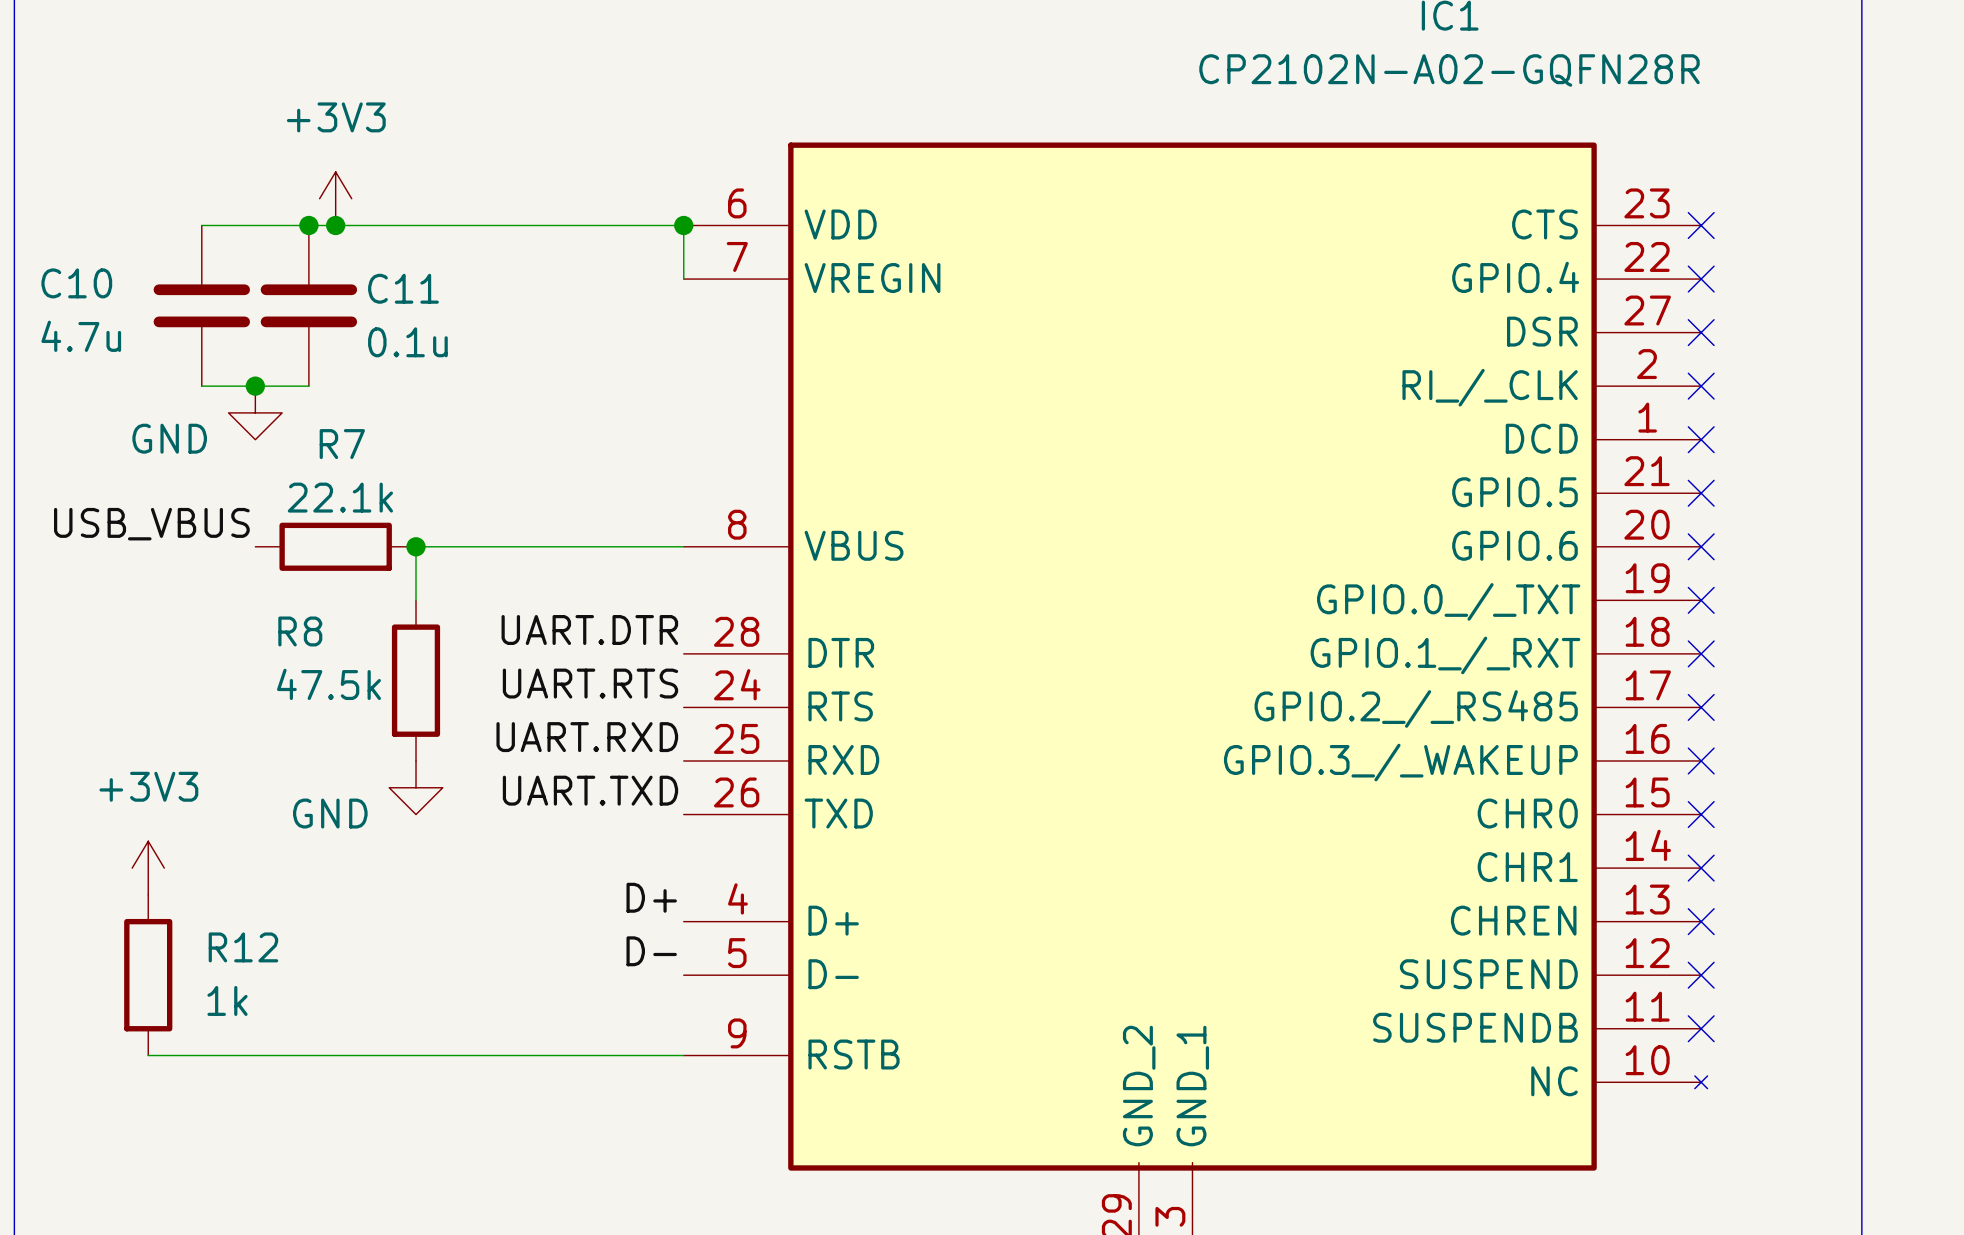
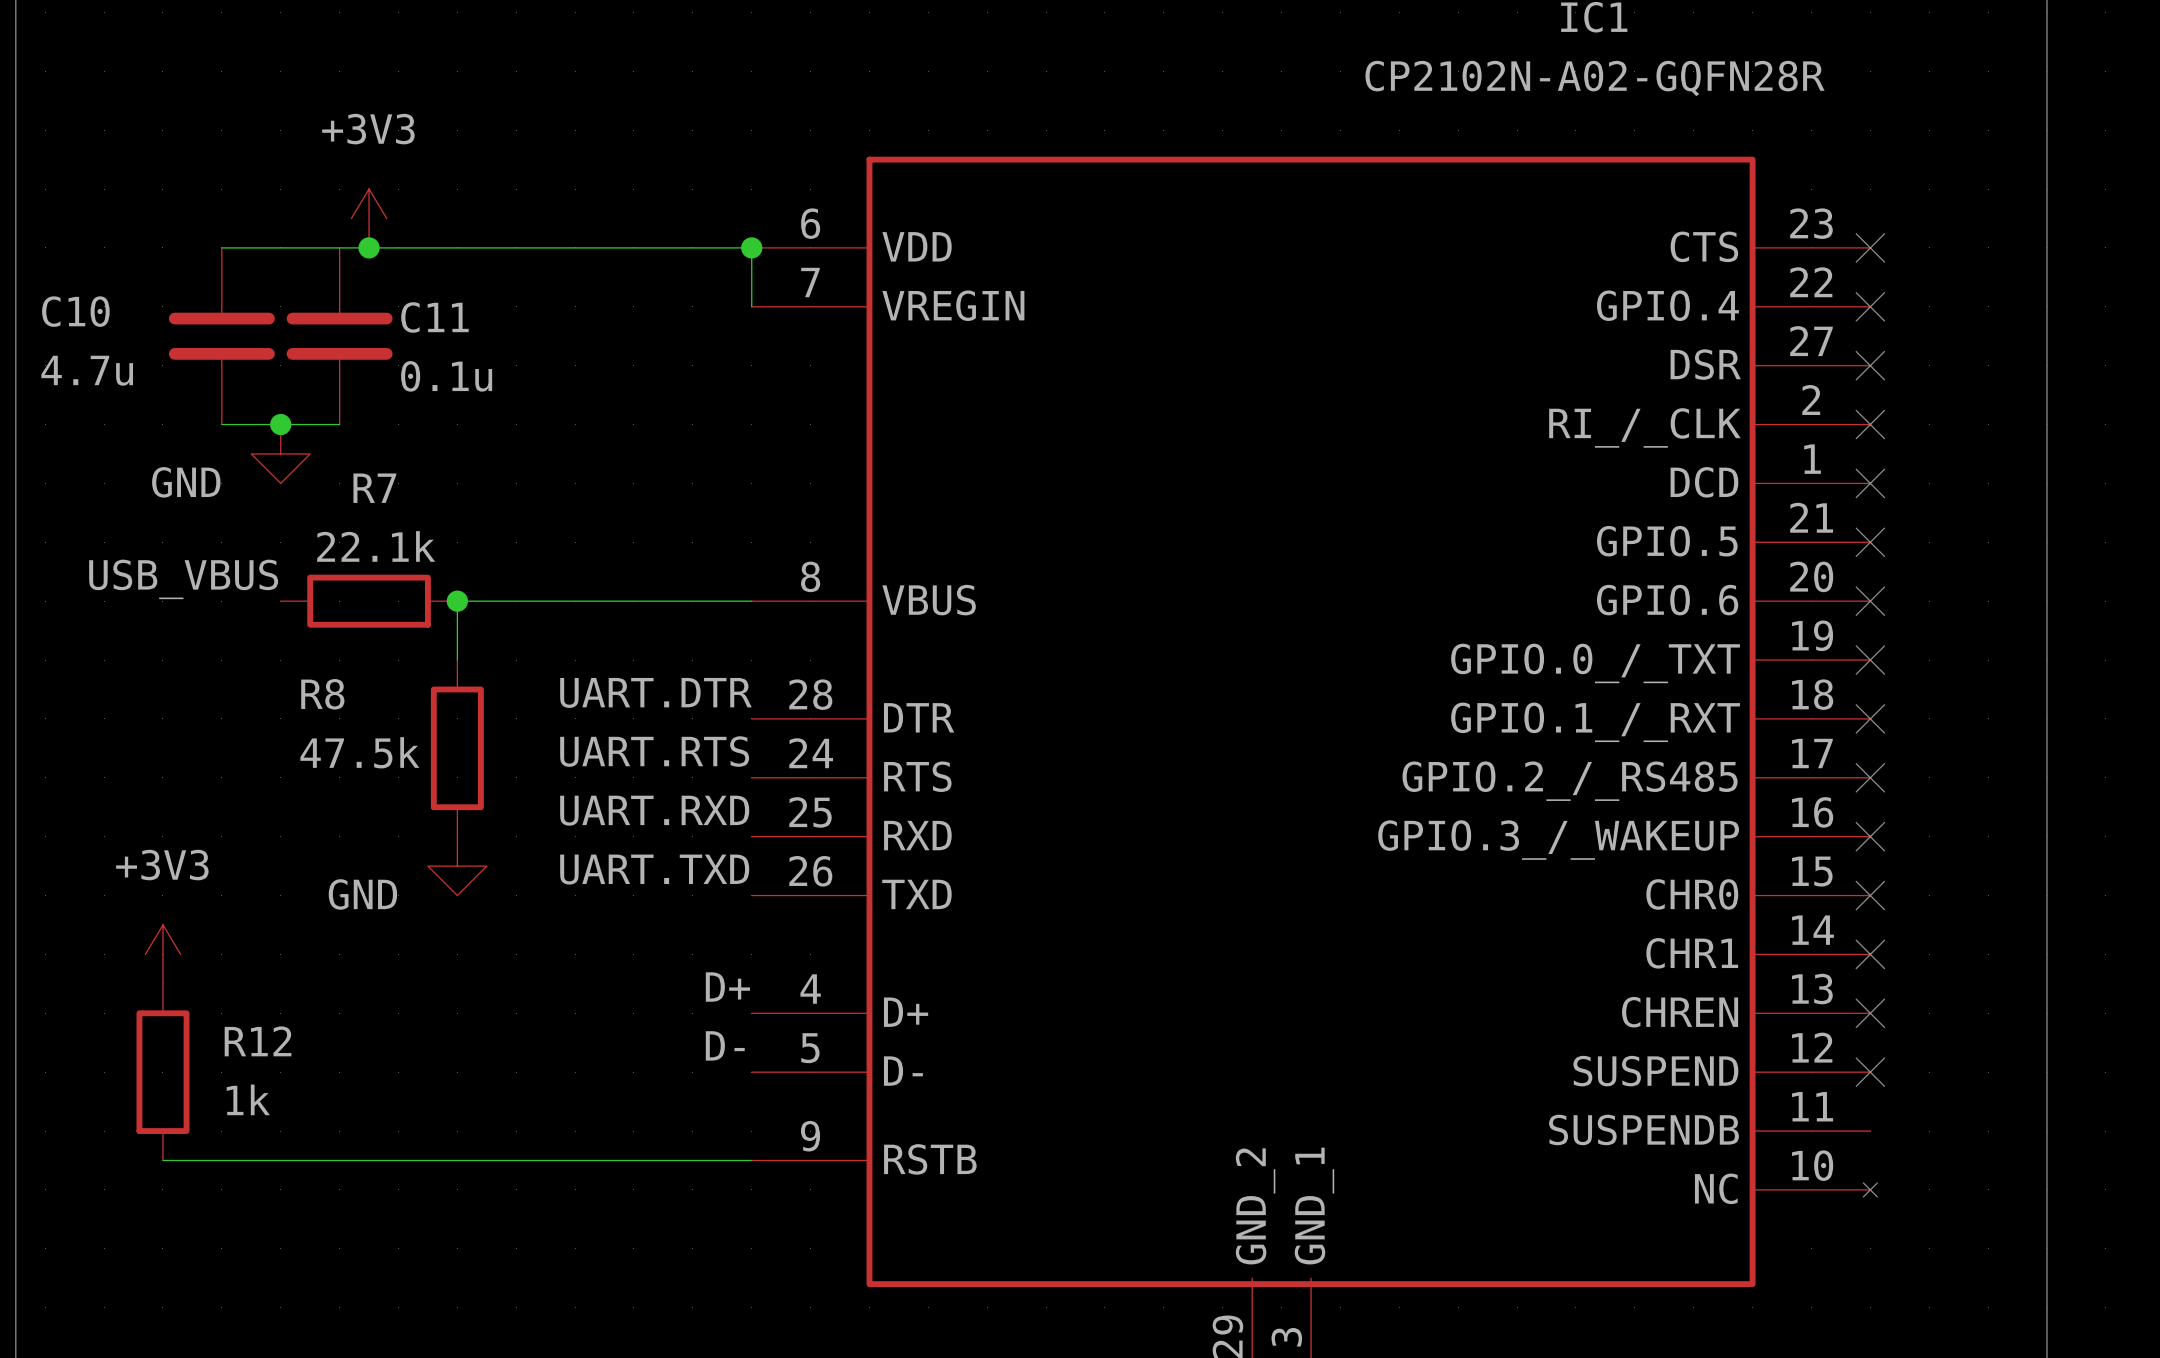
junction: (308, 225) -> none
no-connect mark: (1701, 1028) -> none

